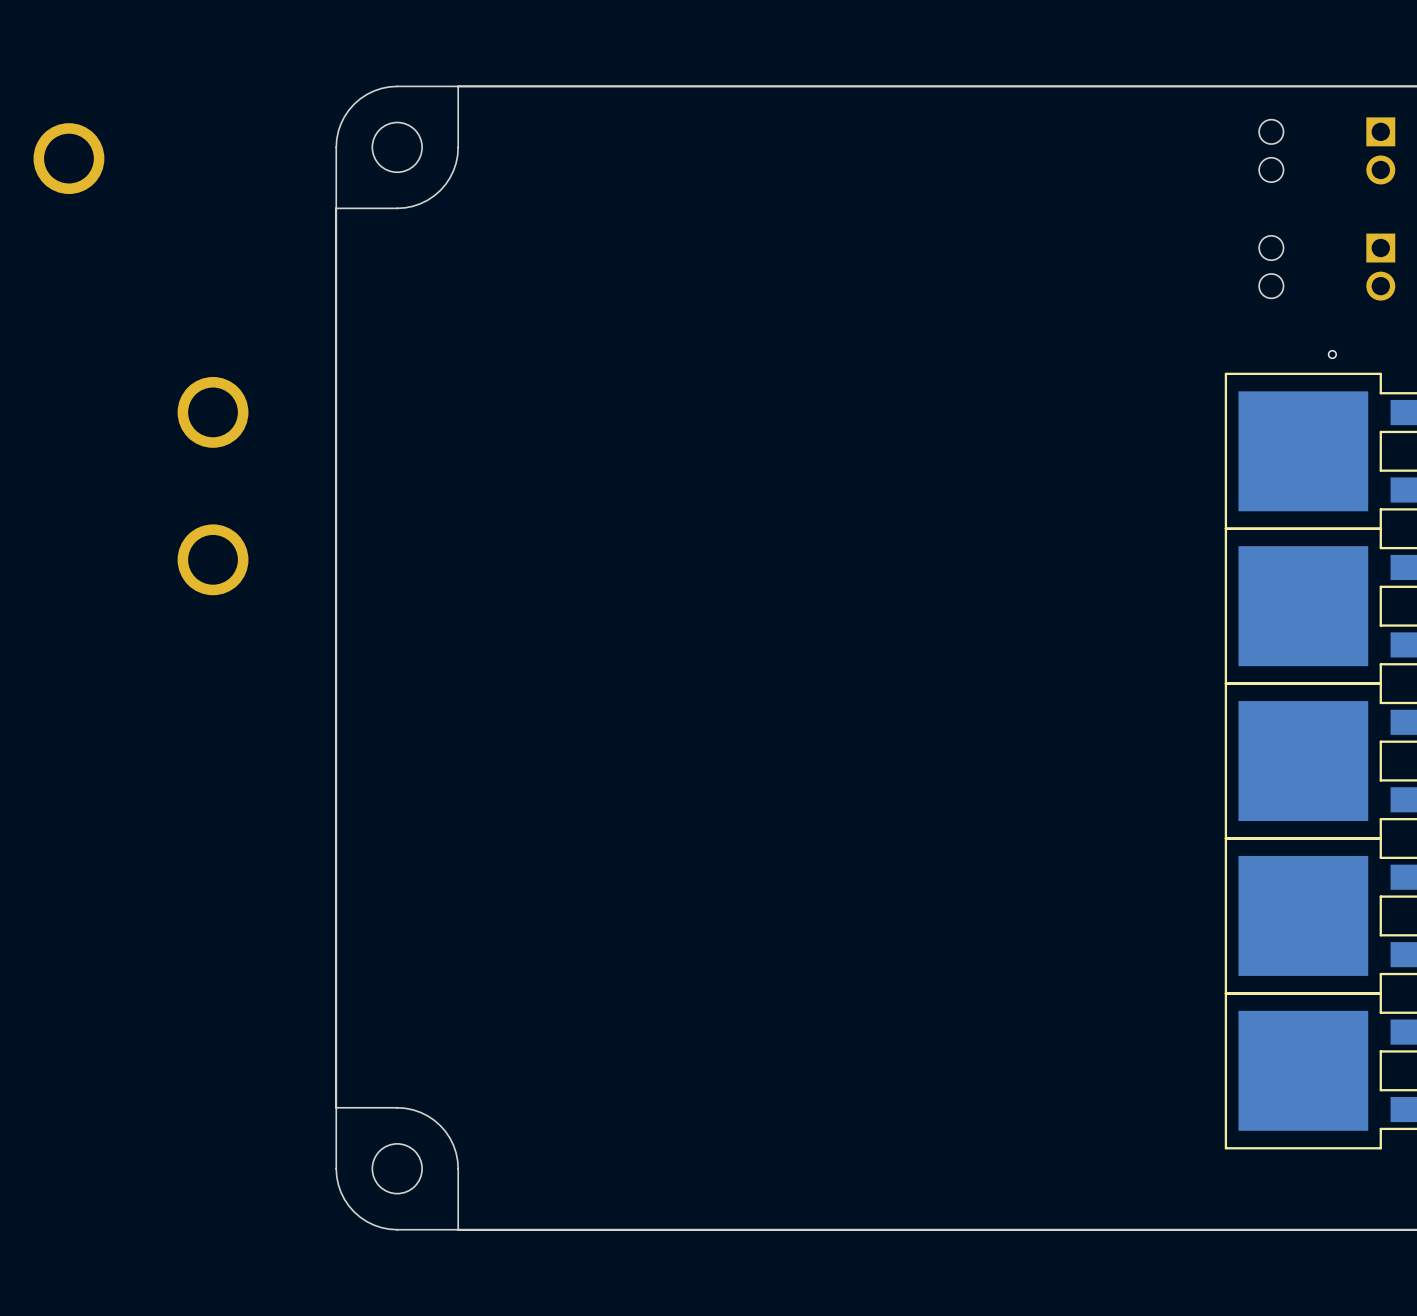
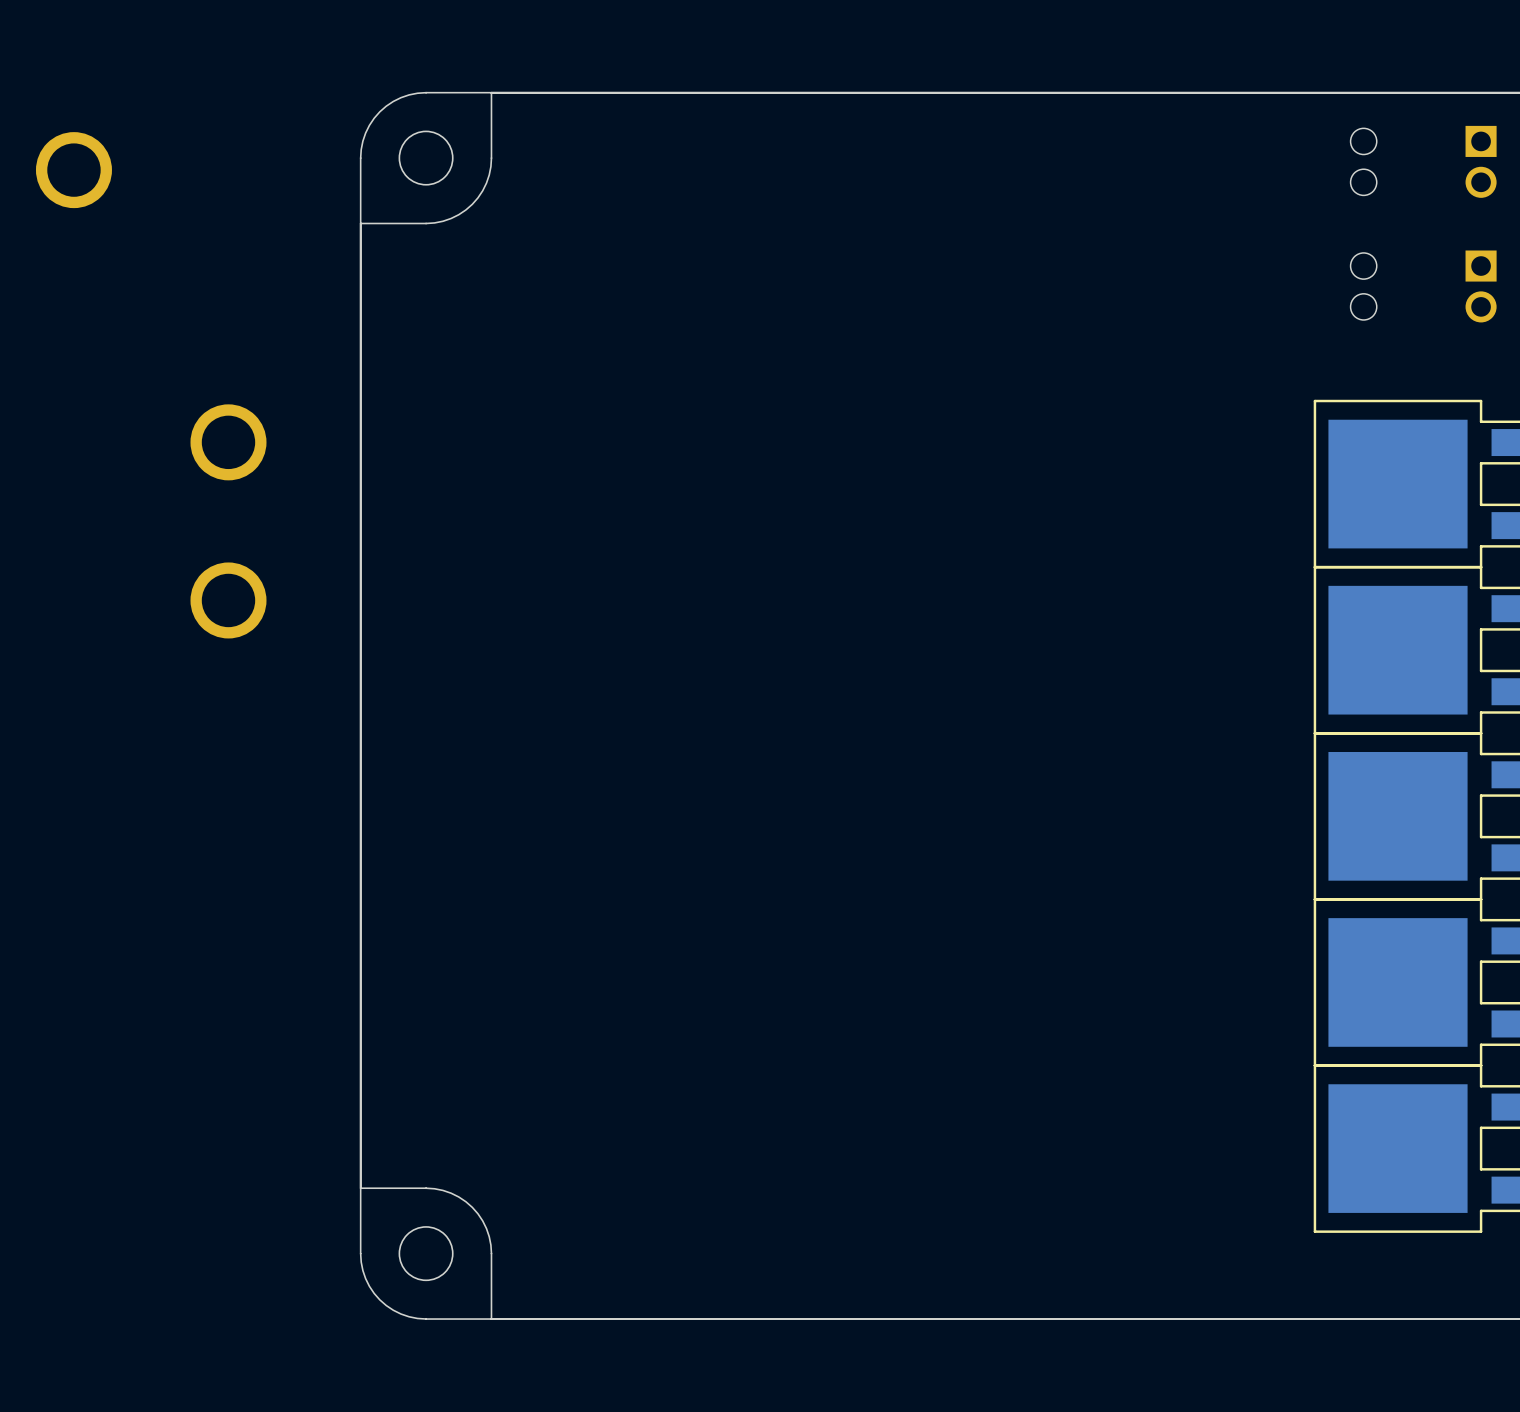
via: (1332, 354) -> none

